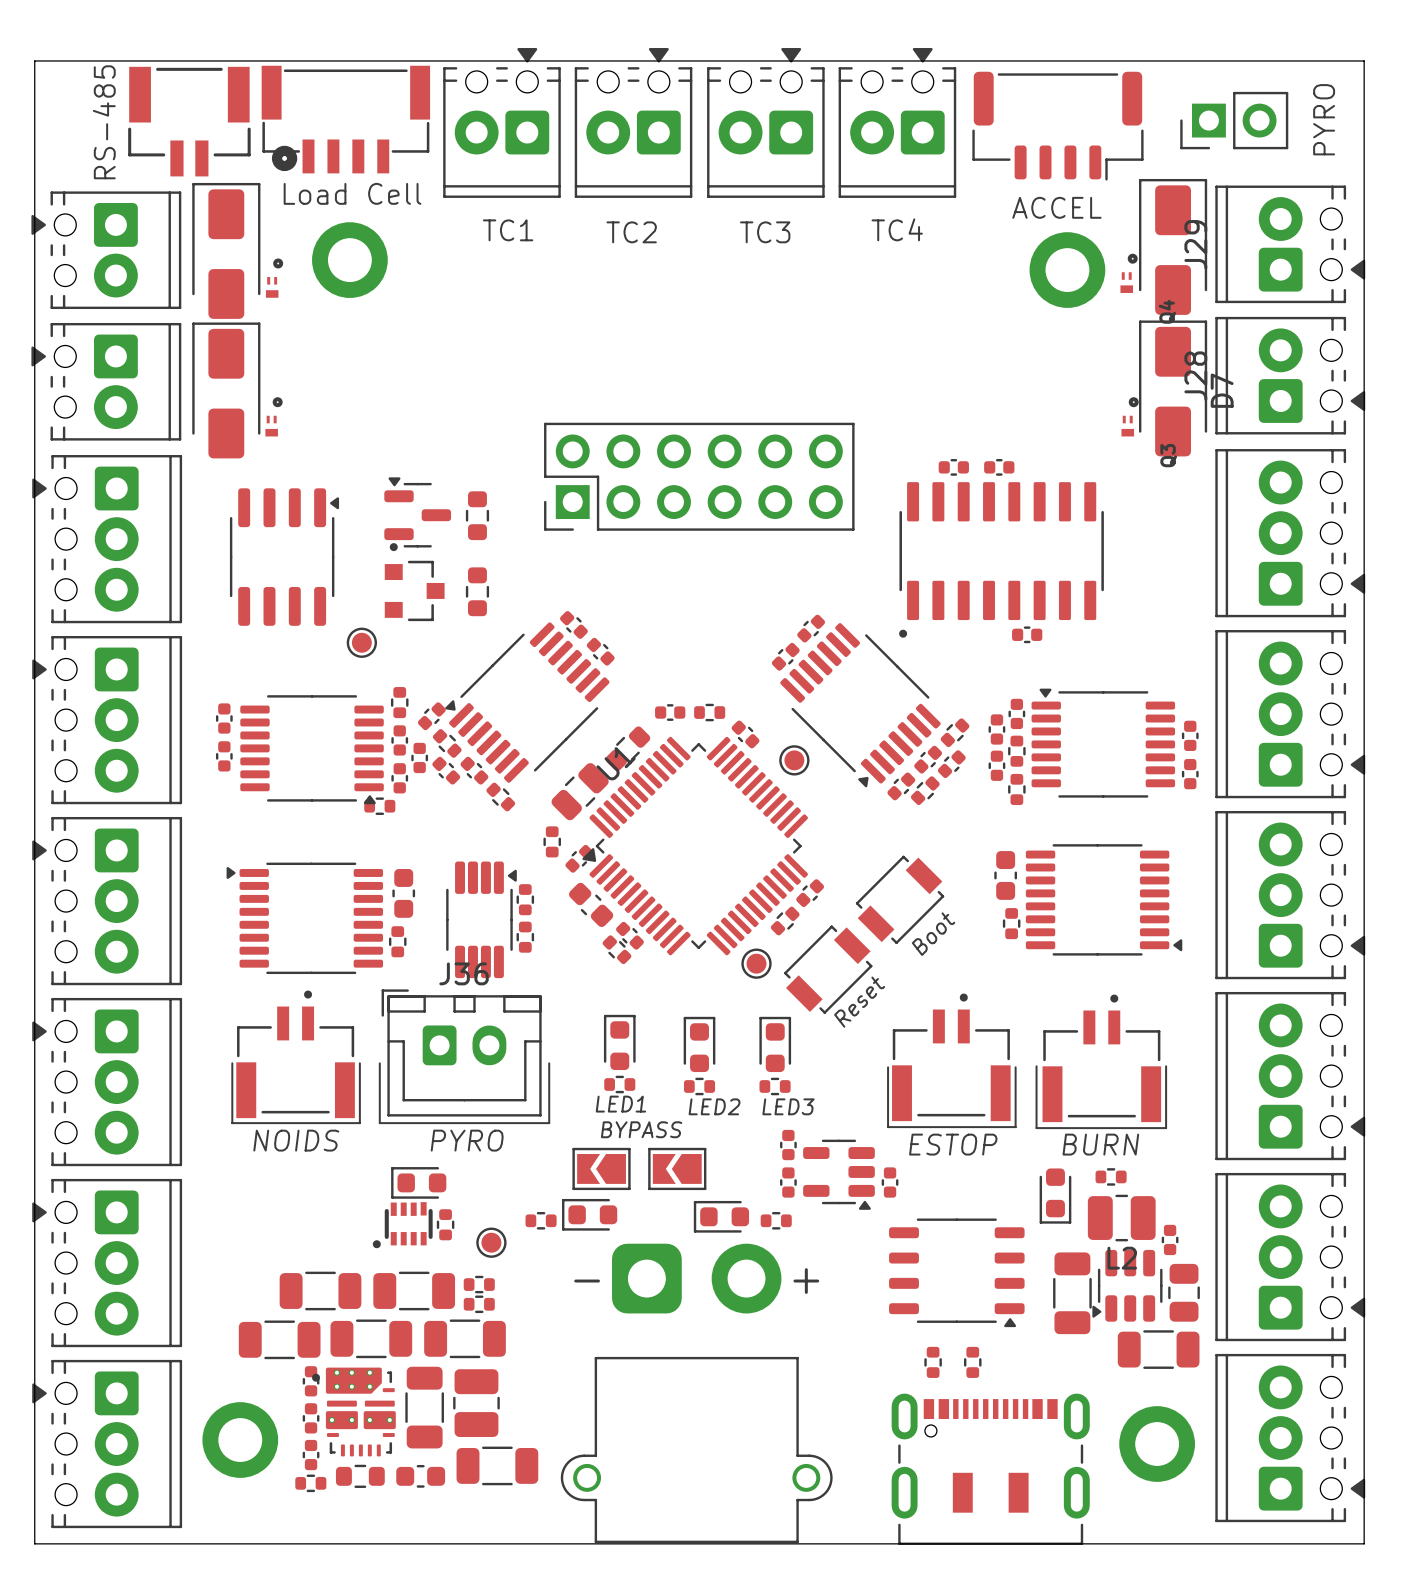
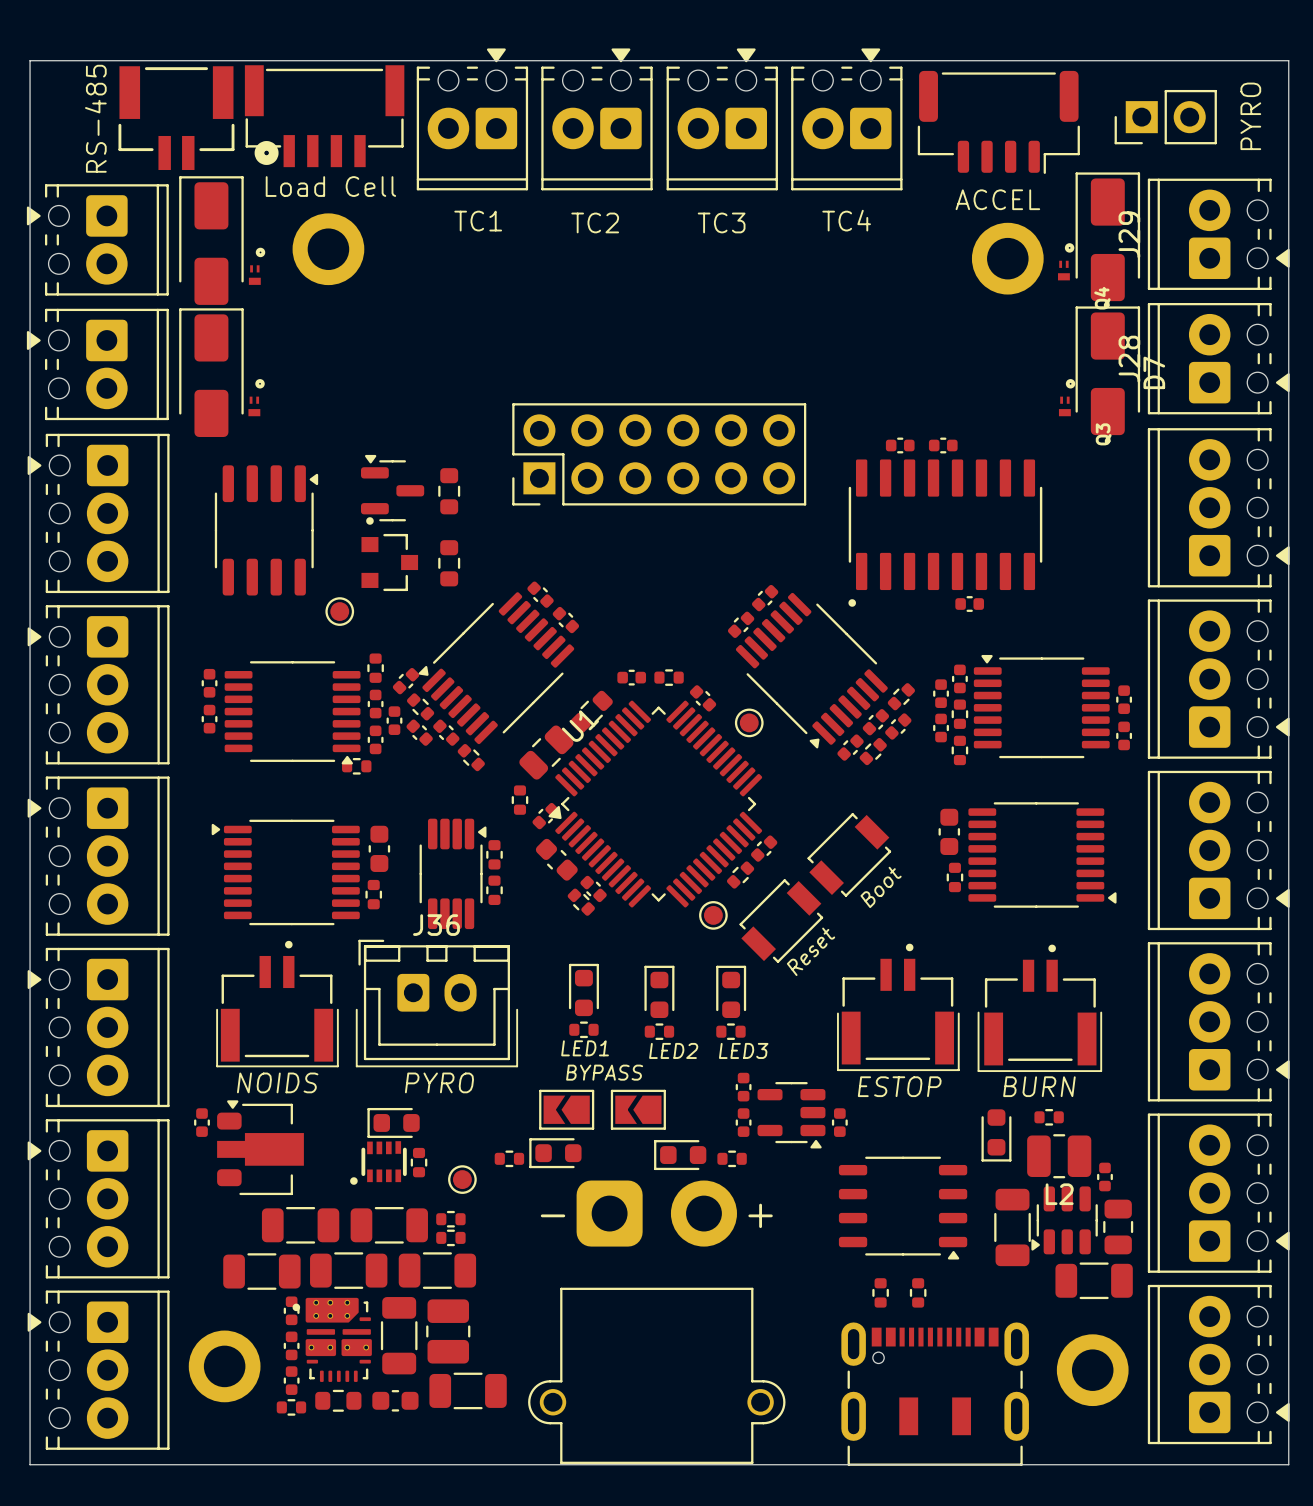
part: none -> (202, 1122)
part: none -> (260, 1147)

